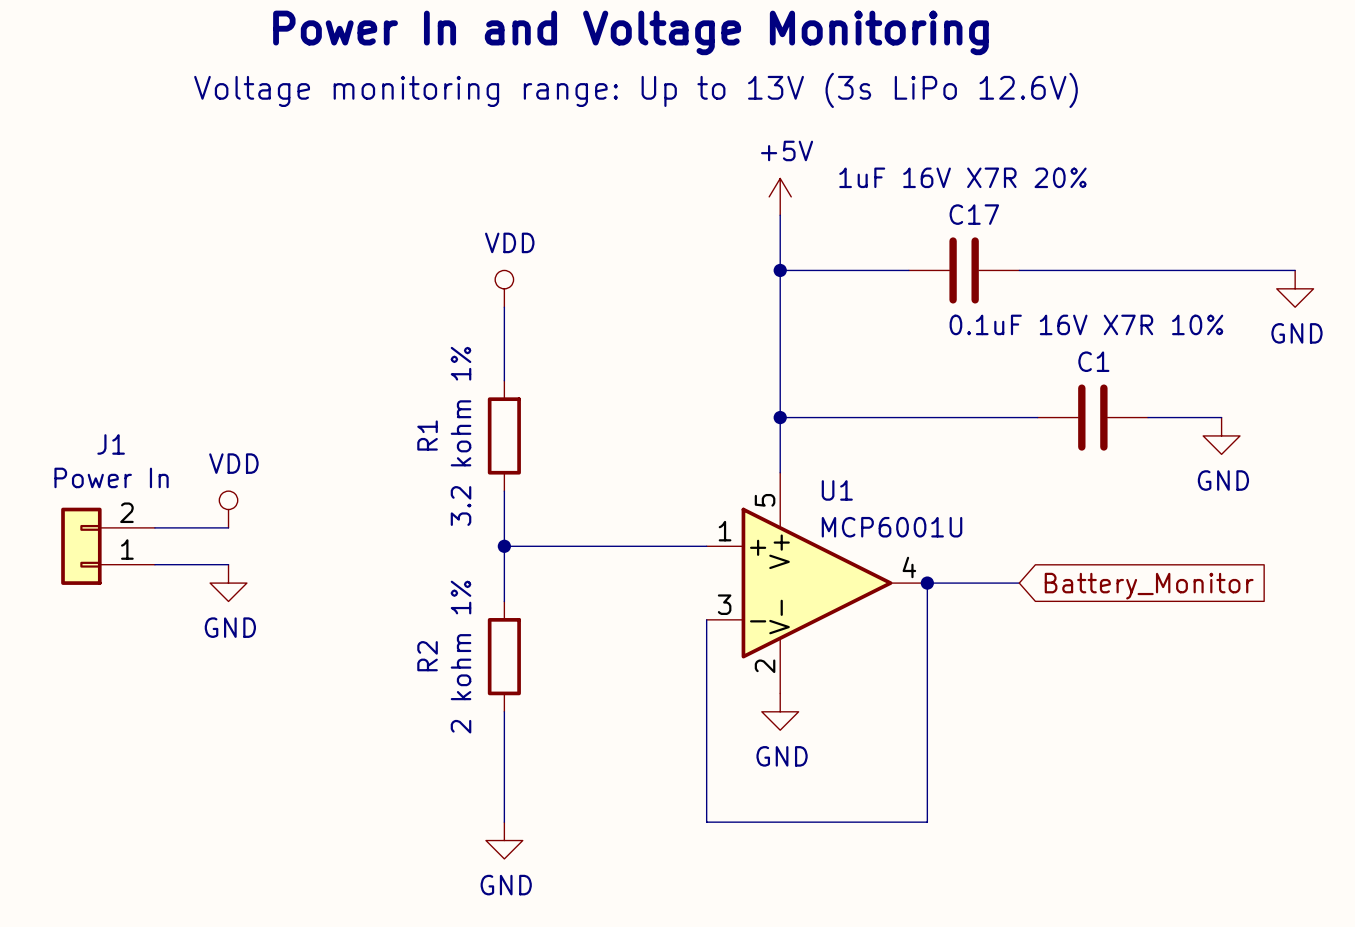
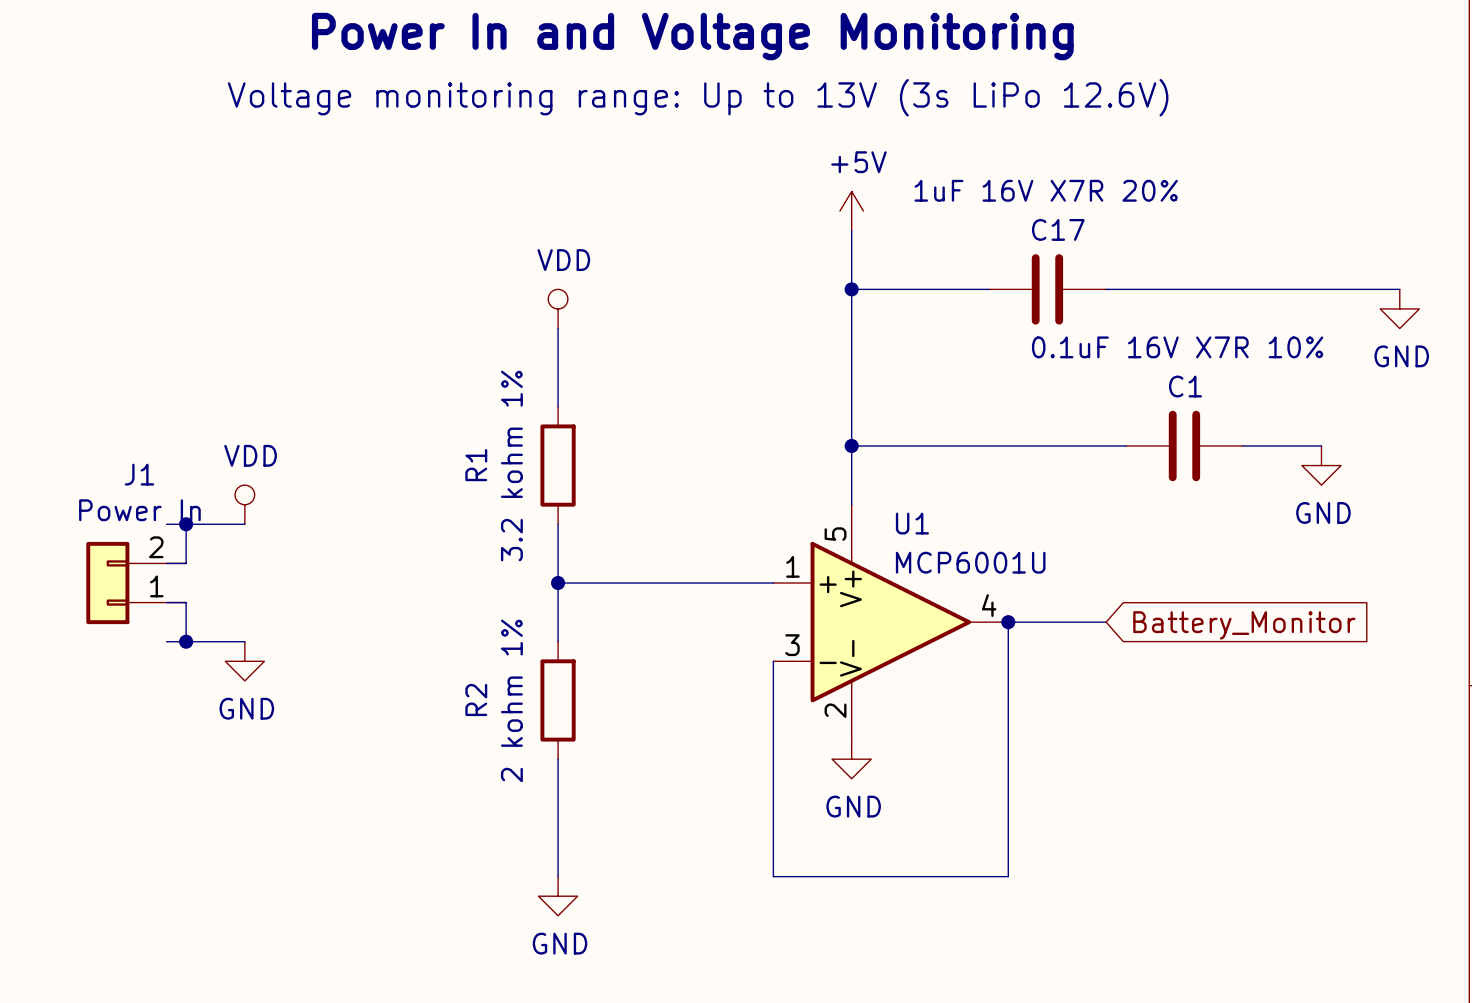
wire: none -> (186, 524) (186, 563) (166, 563)
junction: none -> (186, 524)
power symbol position: VDD (228, 509) -> VDD (244, 504)
wire: (154, 527) (228, 527) -> (166, 524) (244, 524)
wire: none -> (166, 602) (186, 602) (186, 641)
wire: (154, 564) (228, 564) -> (166, 641) (244, 641)
power symbol position: GND (228, 583) -> GND (244, 661)
junction: none -> (186, 641)

